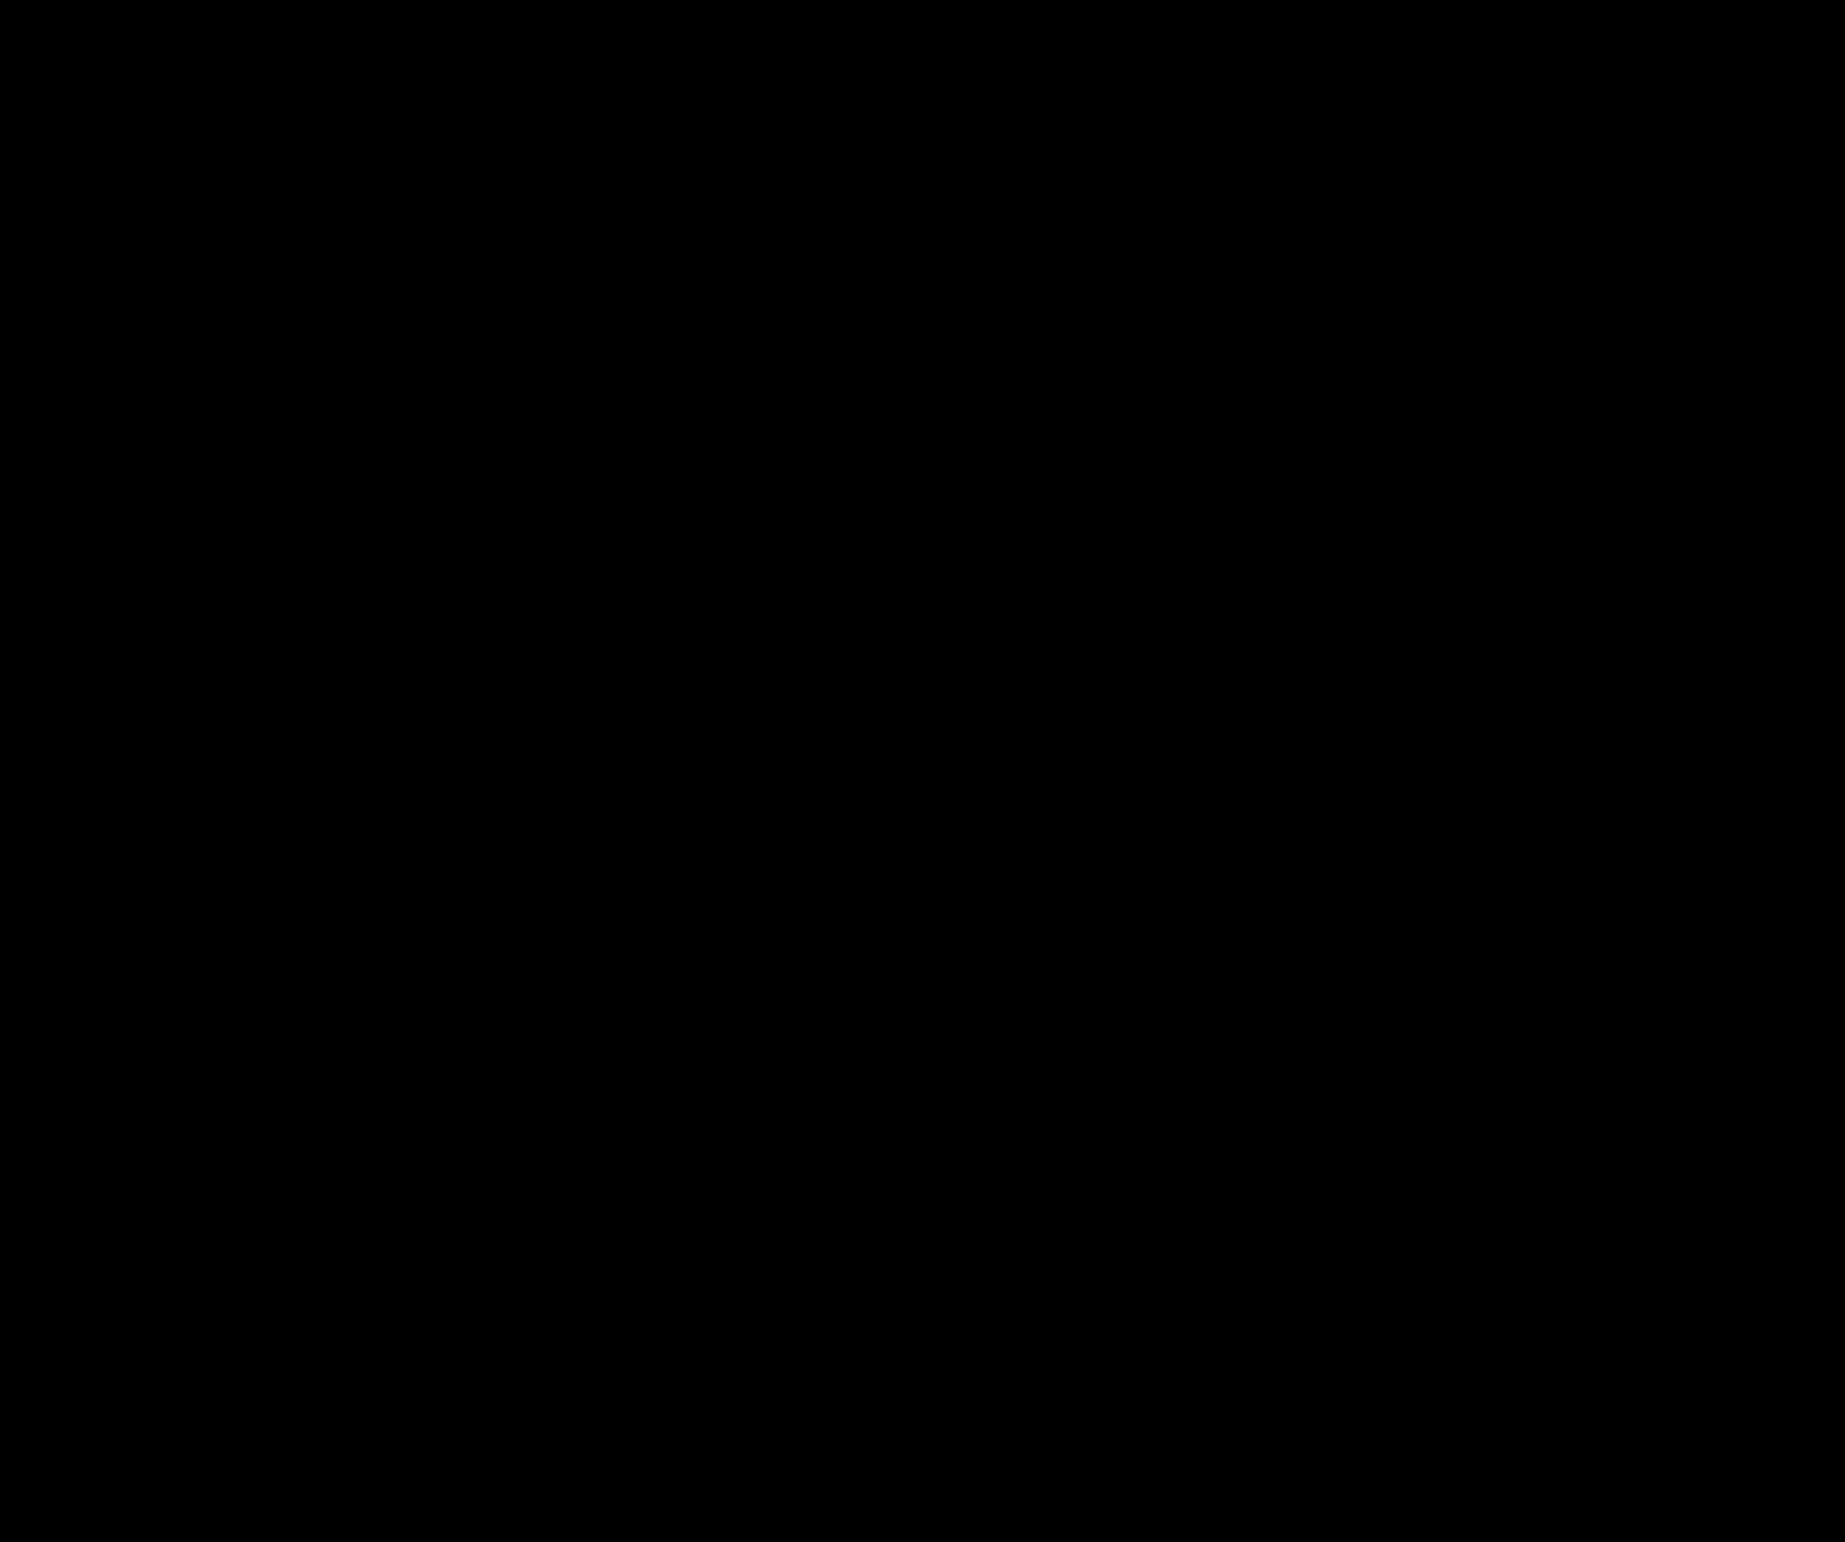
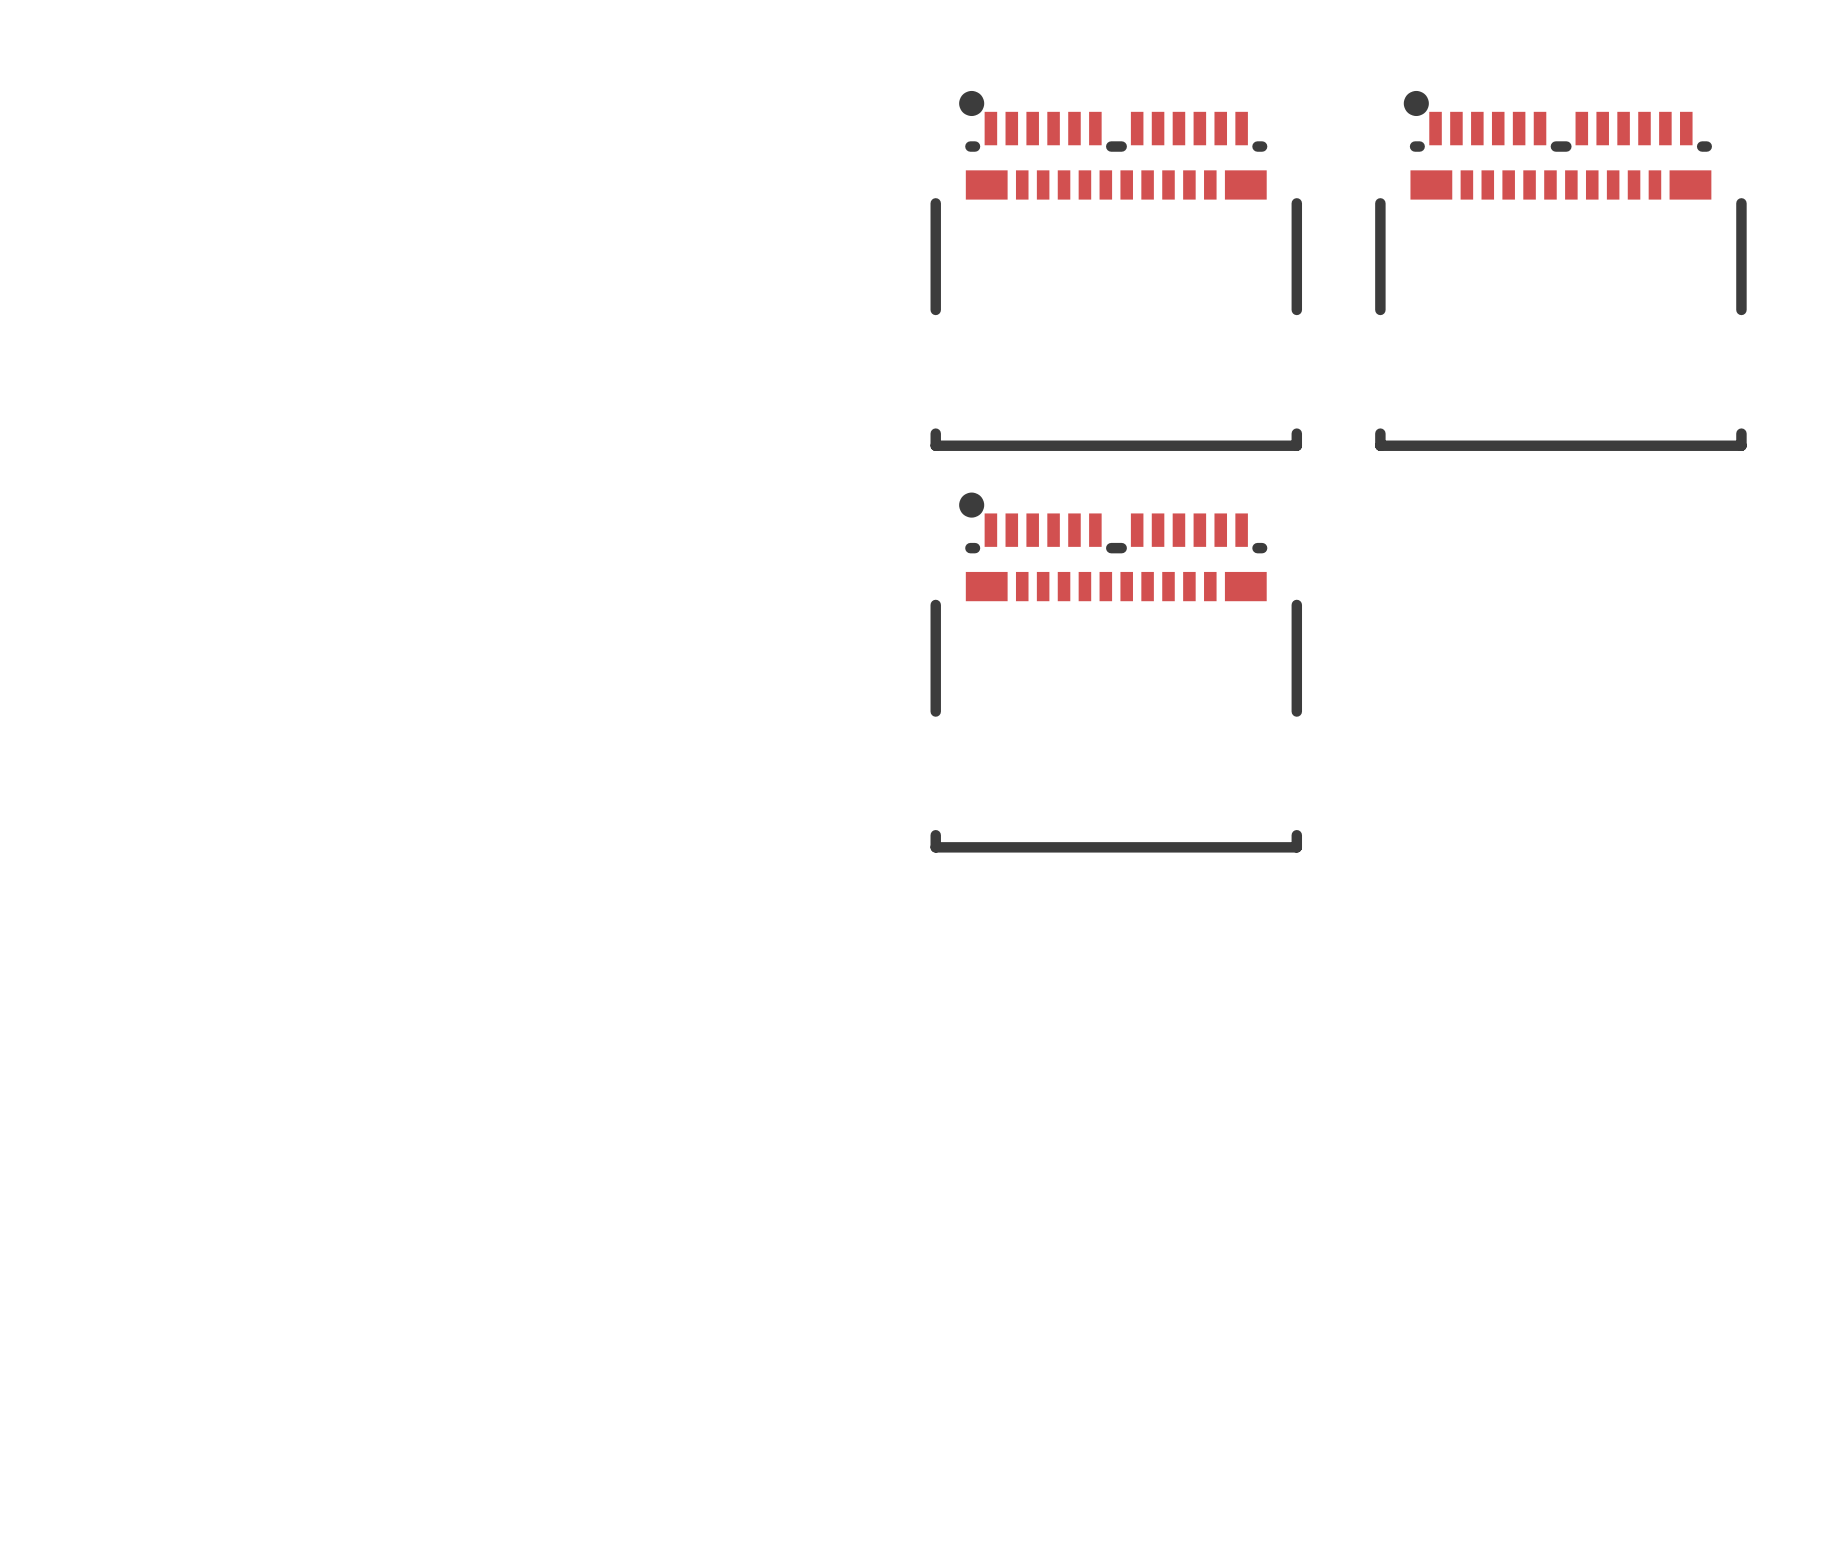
part: none -> (1116, 270)
part: none -> (1560, 270)
part: none -> (1116, 672)

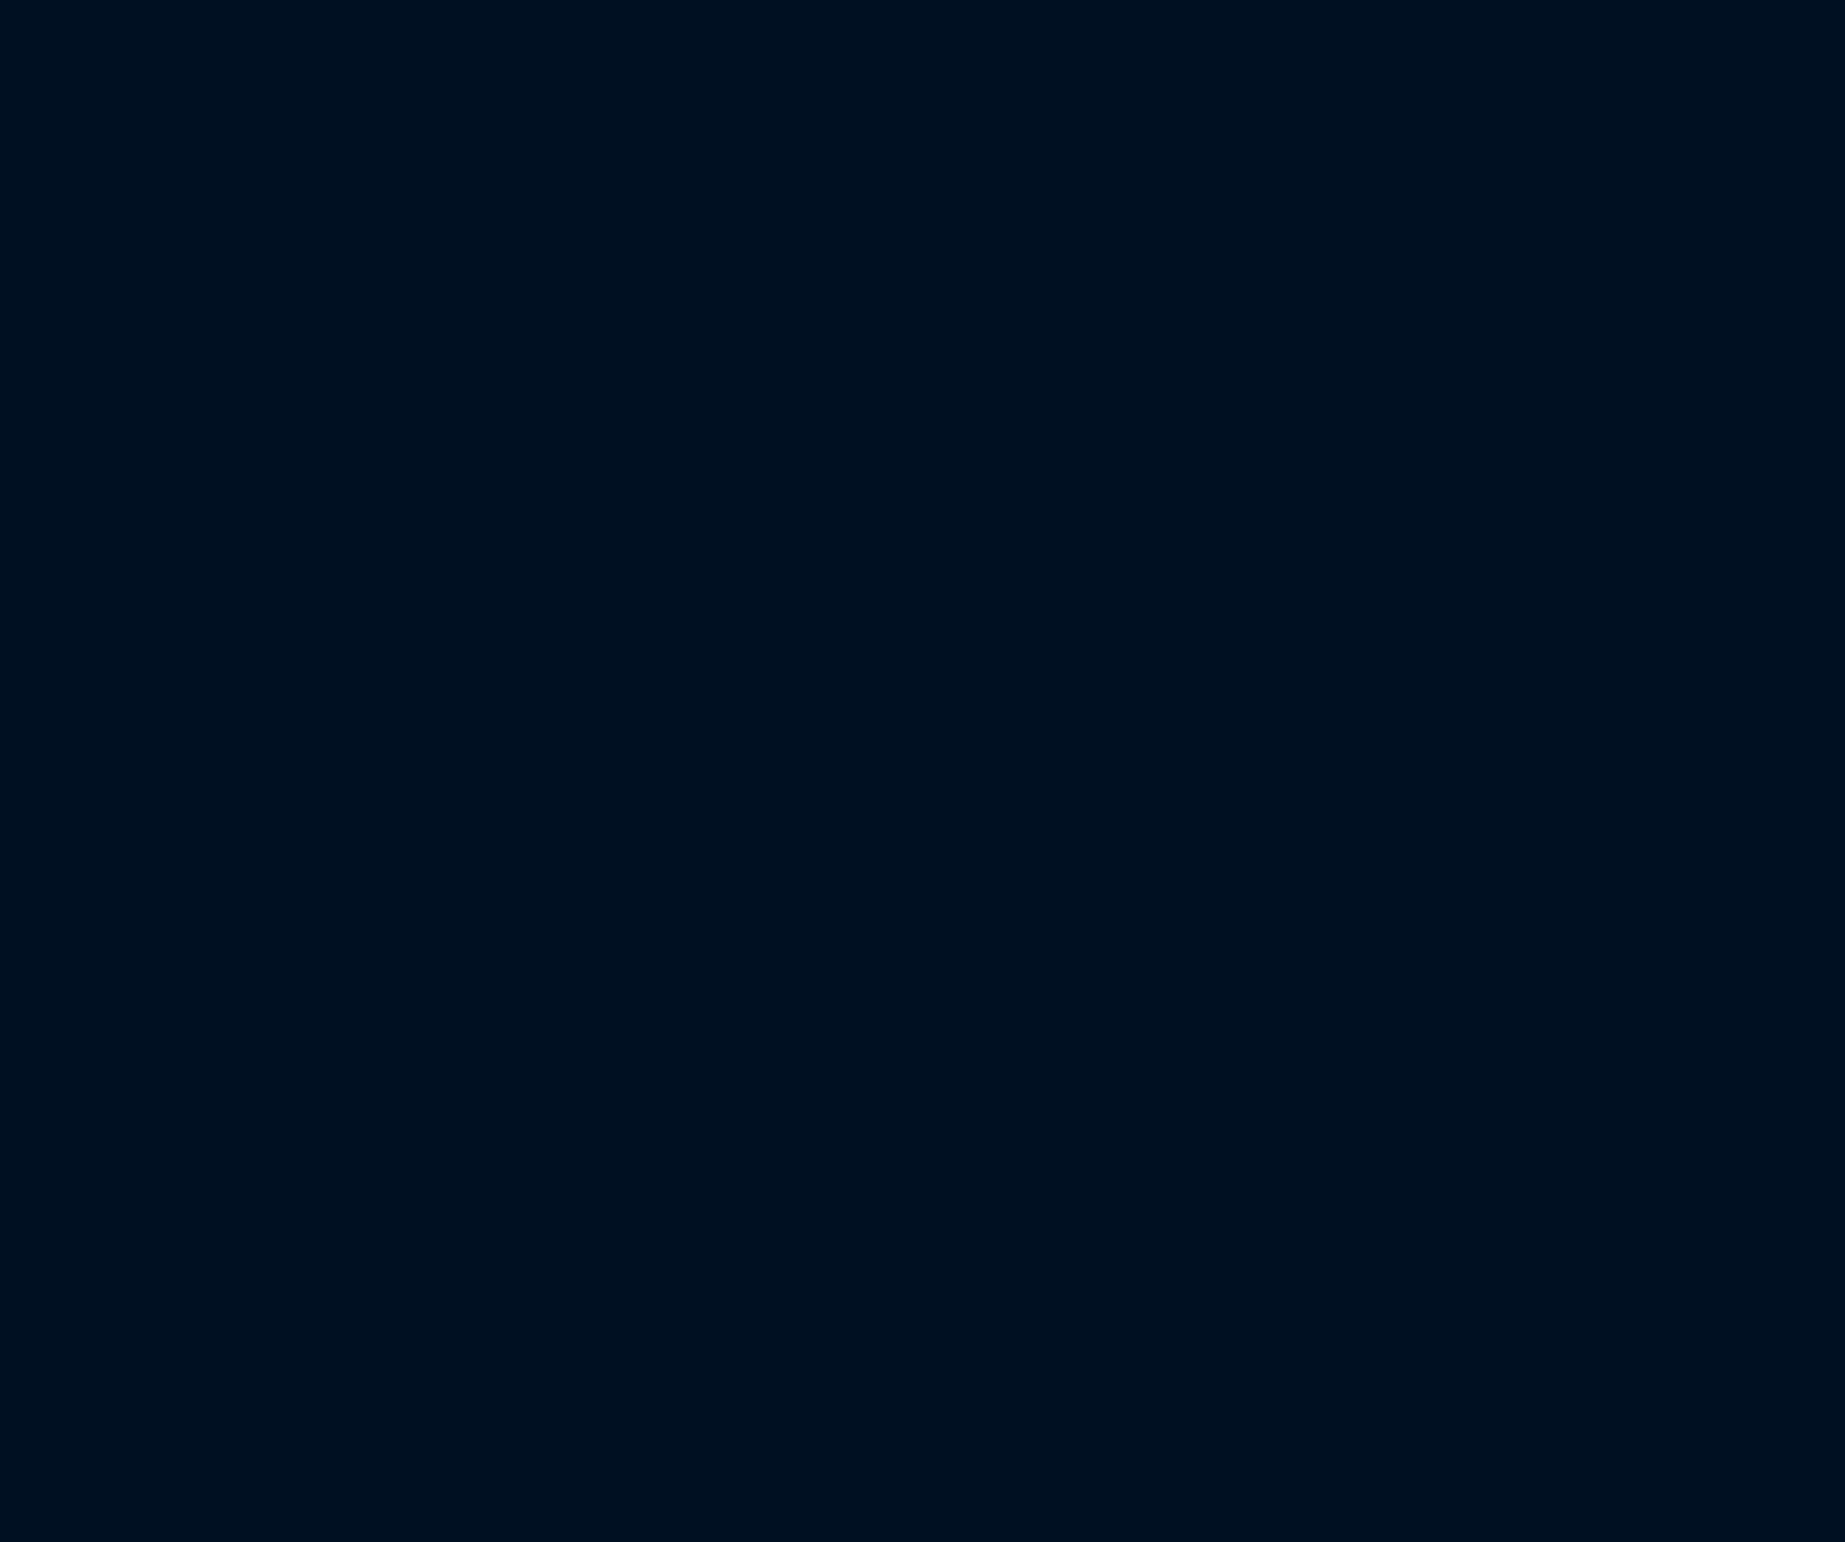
part: (1116, 270) -> none
part: (1560, 270) -> none
part: (1116, 672) -> none

